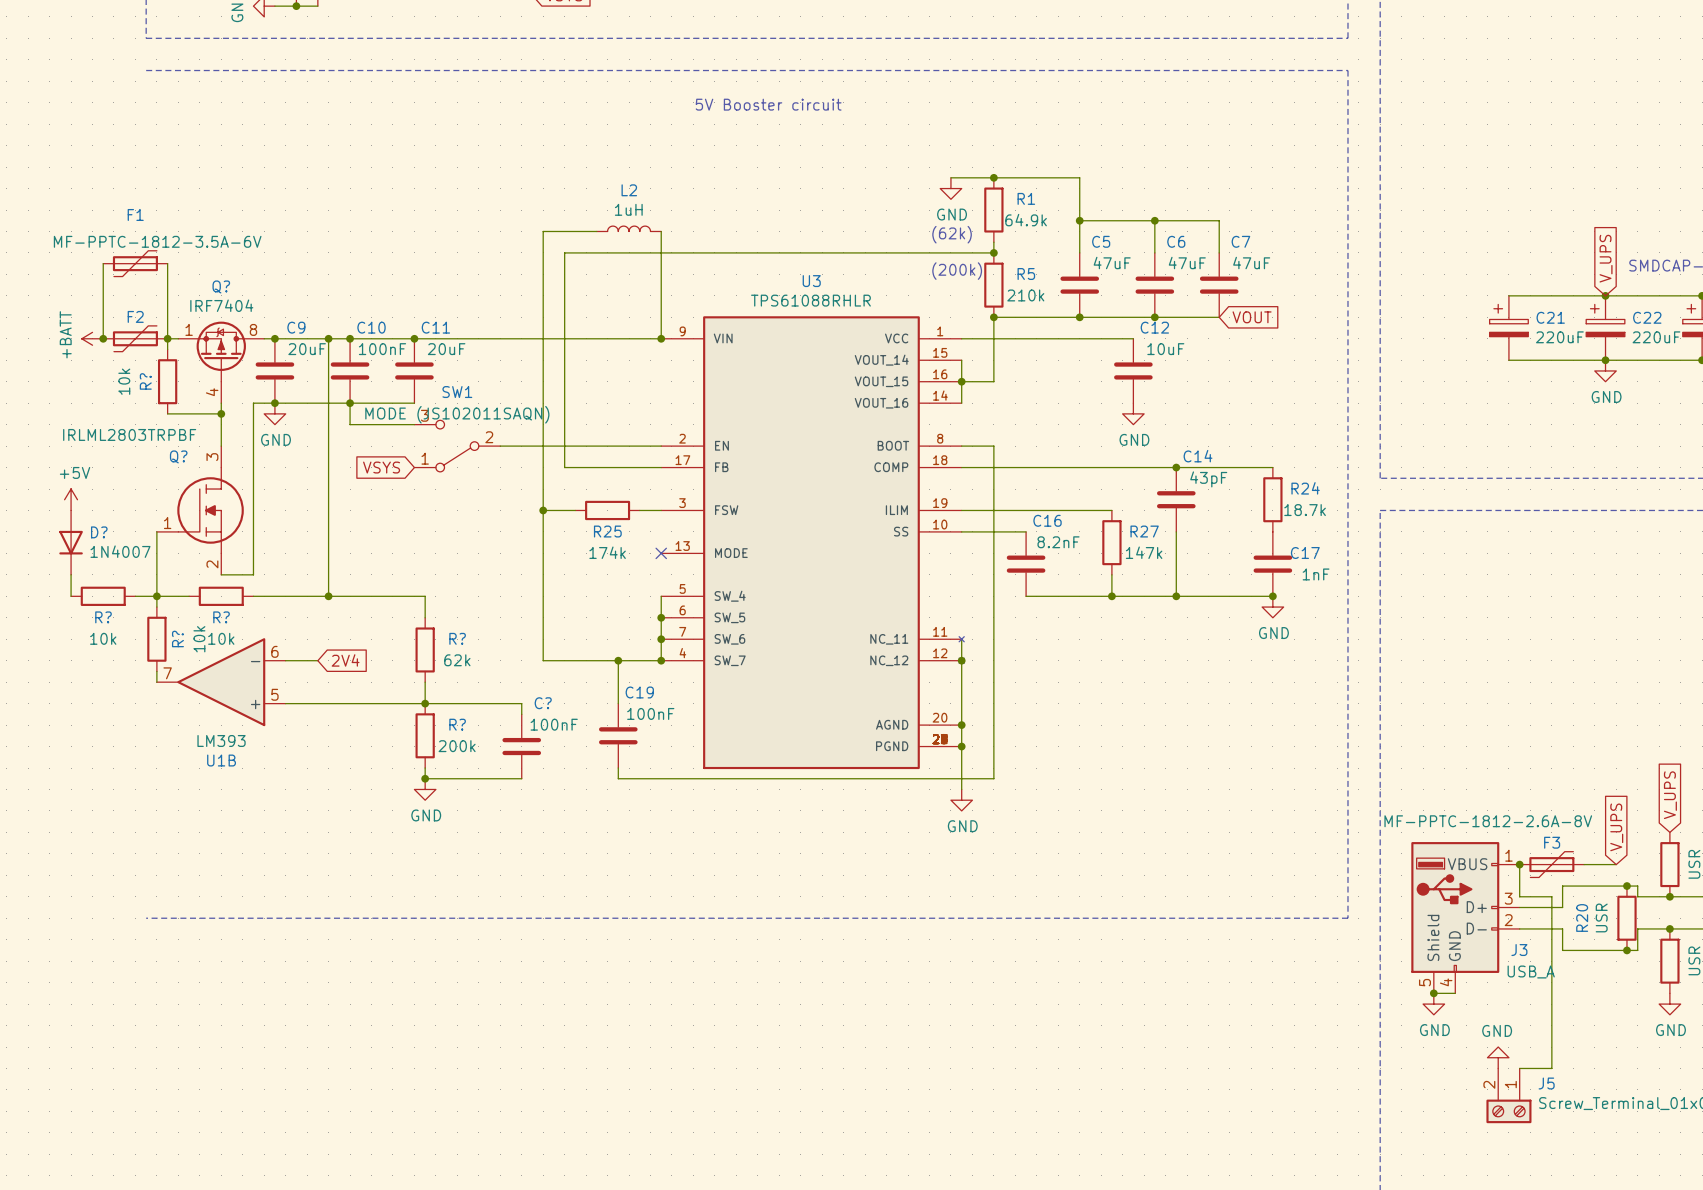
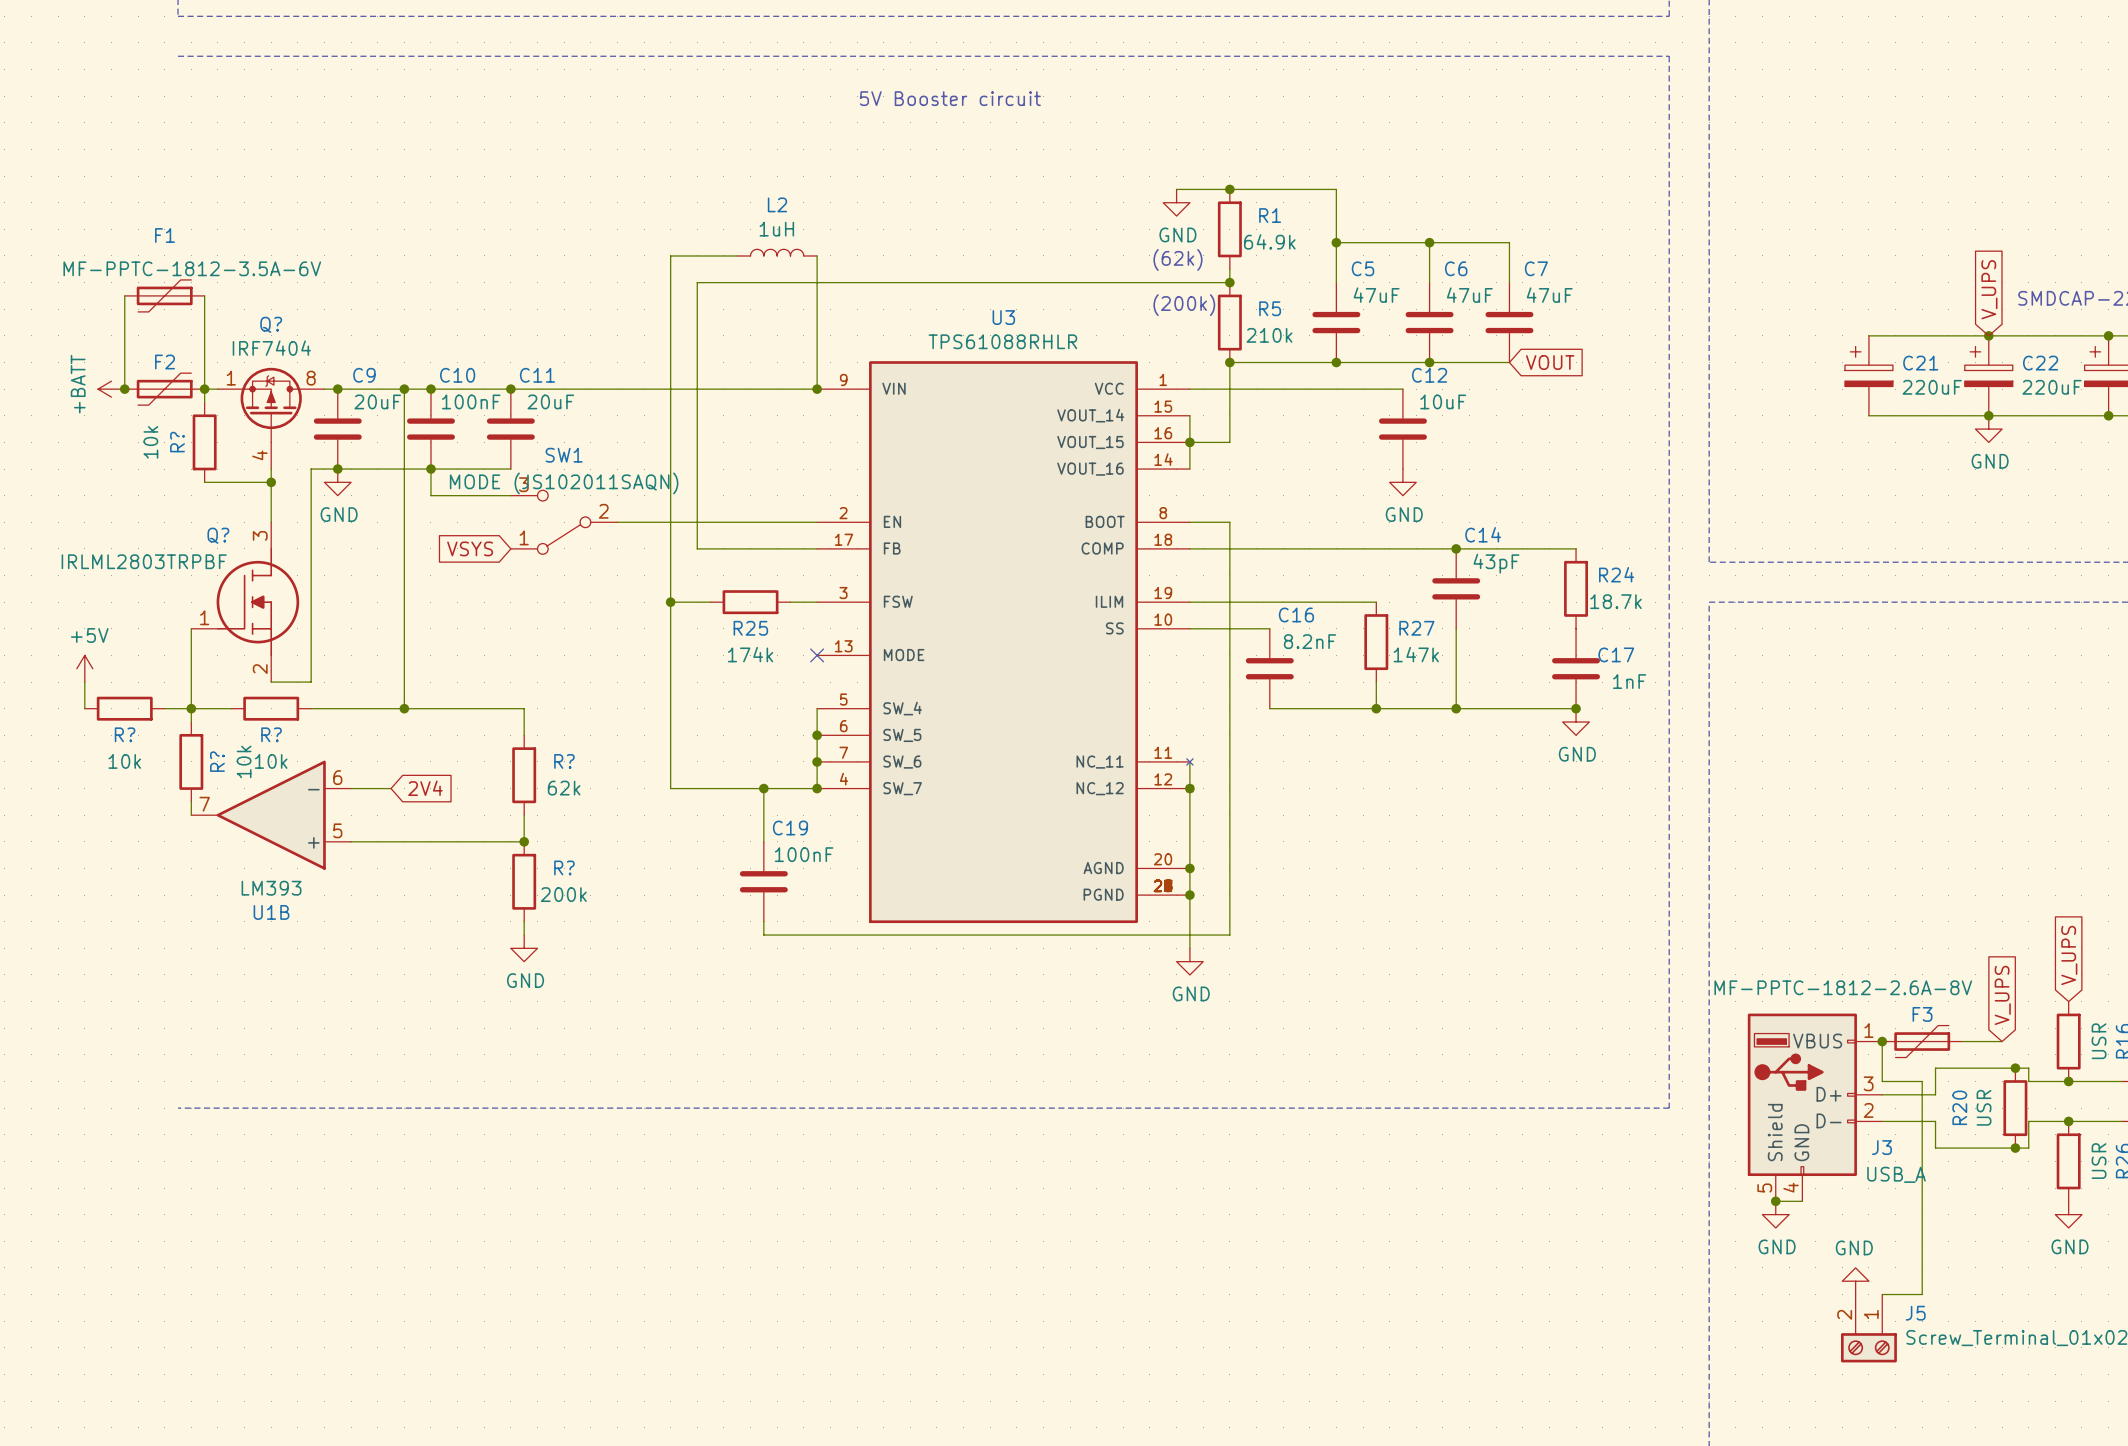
Q? value position: IRLML2803TRPBF (129, 434) -> IRLML2803TRPBF (144, 561)
power symbol position: +5V (71, 499) -> +5V (84, 668)
D?: 1N4007 (71, 542) -> none
wire: (425, 703) (521, 703) (521, 714) -> none
C?: 100nF (521, 746) -> none
wire: (425, 778) (521, 778) -> none
junction: (425, 778) -> none

